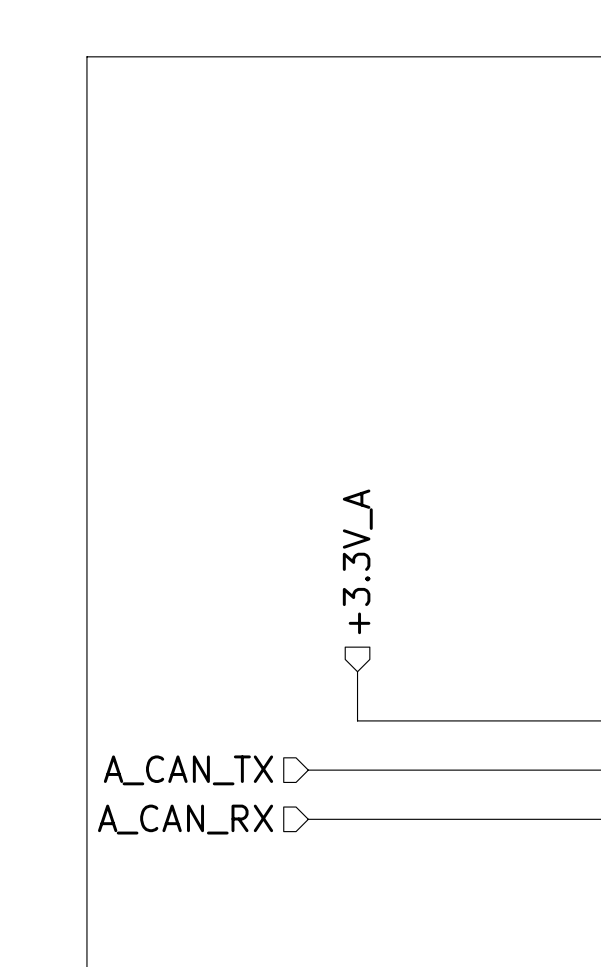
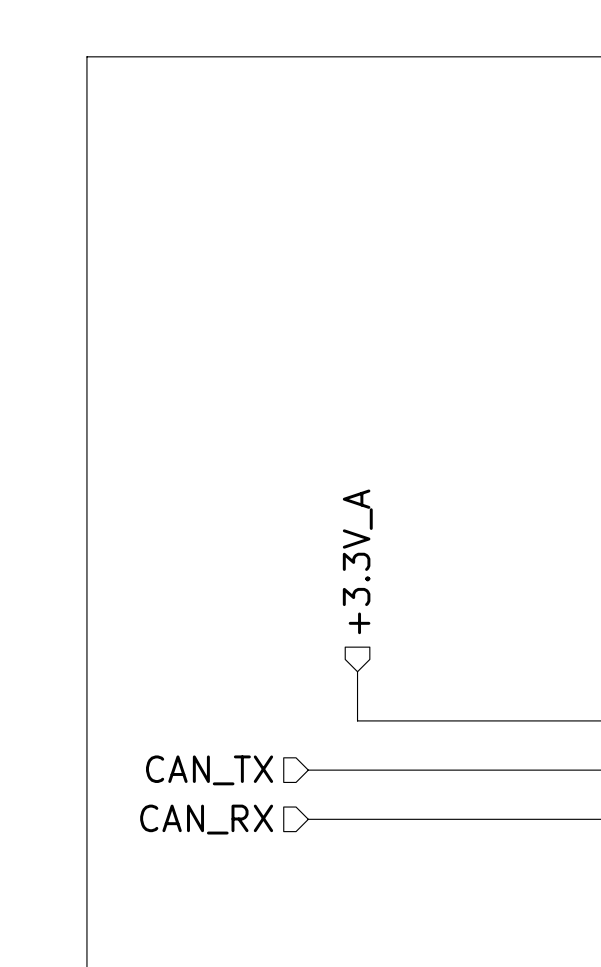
hierarchical label: A_CAN_TX (188, 770) -> CAN_TX (209, 770)
hierarchical label: A_CAN_RX (185, 819) -> CAN_RX (206, 819)

